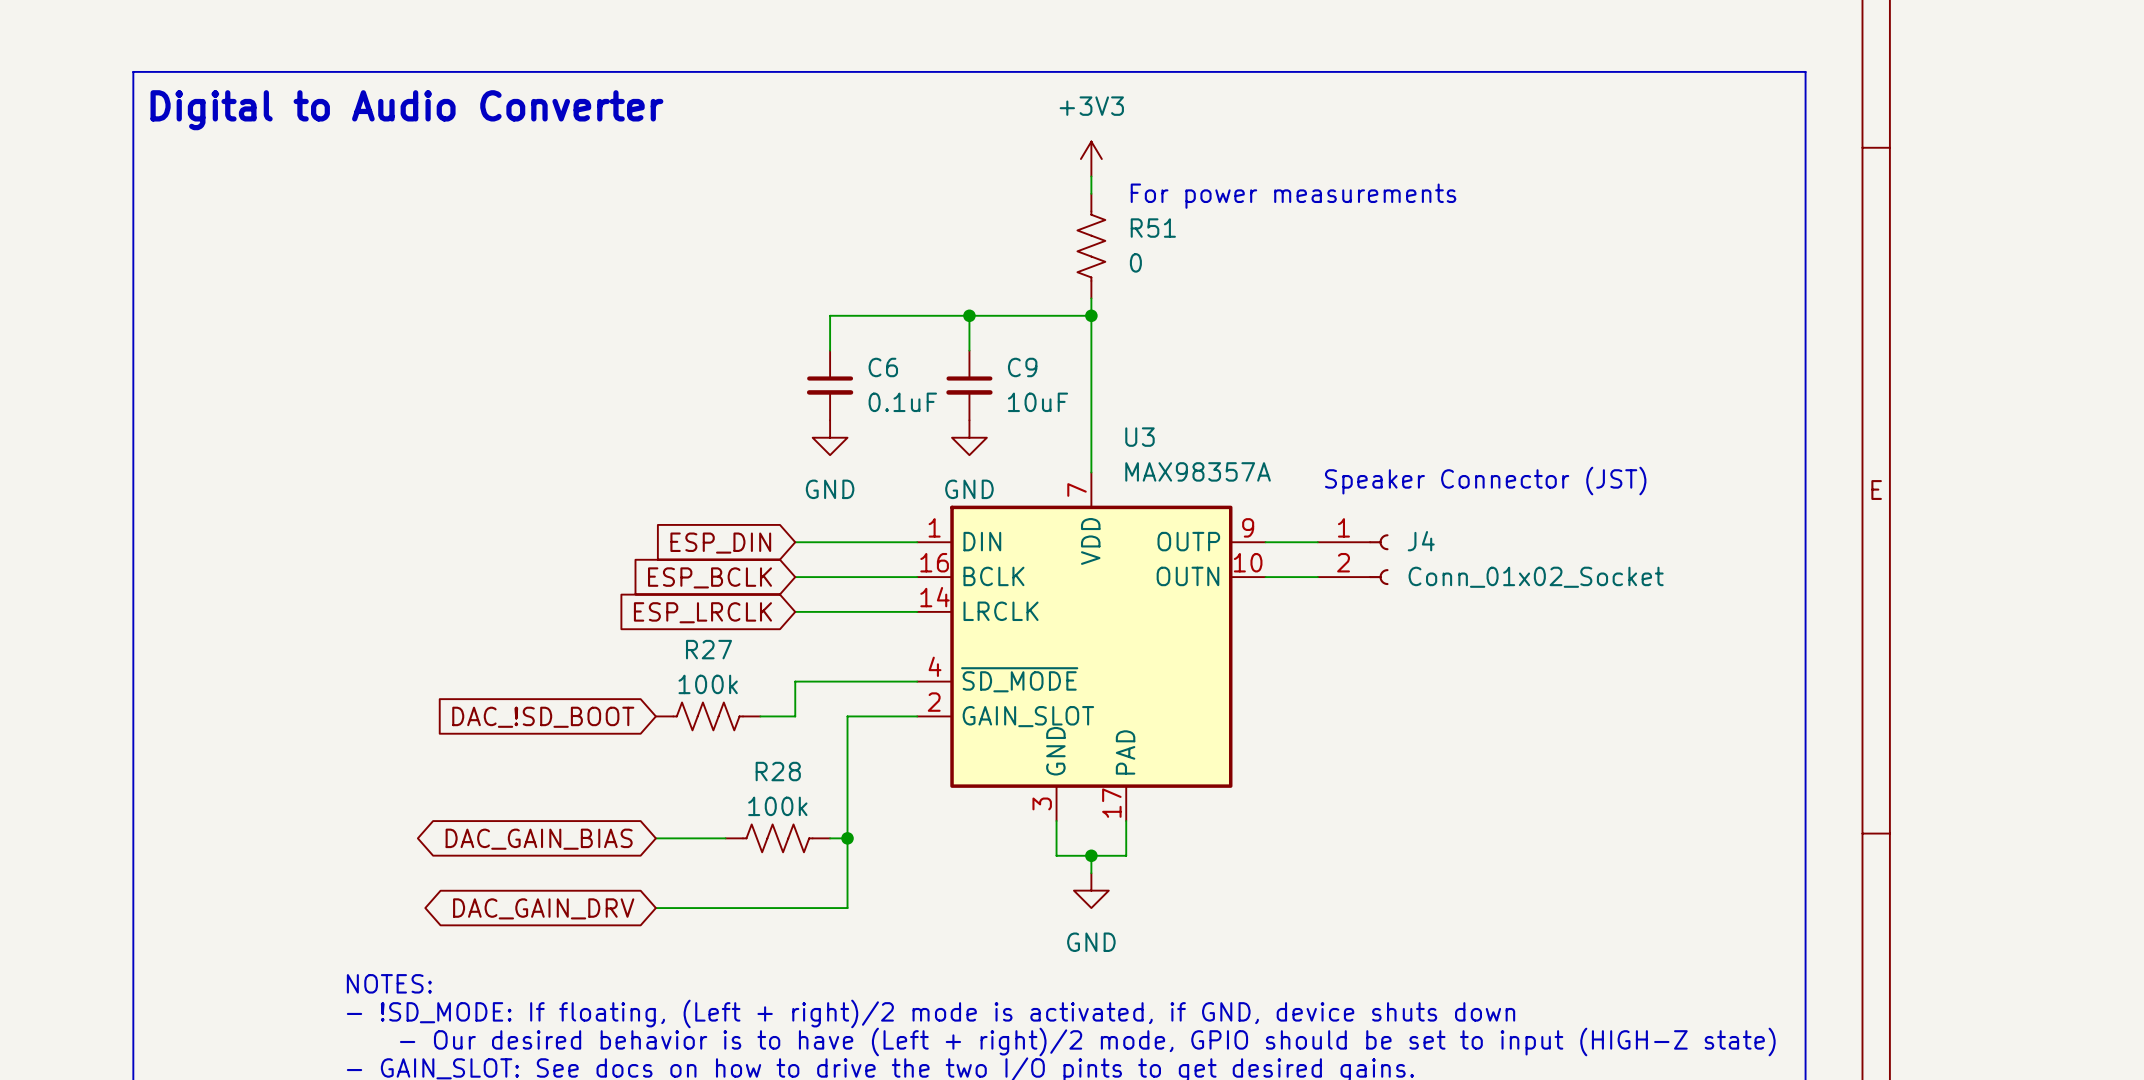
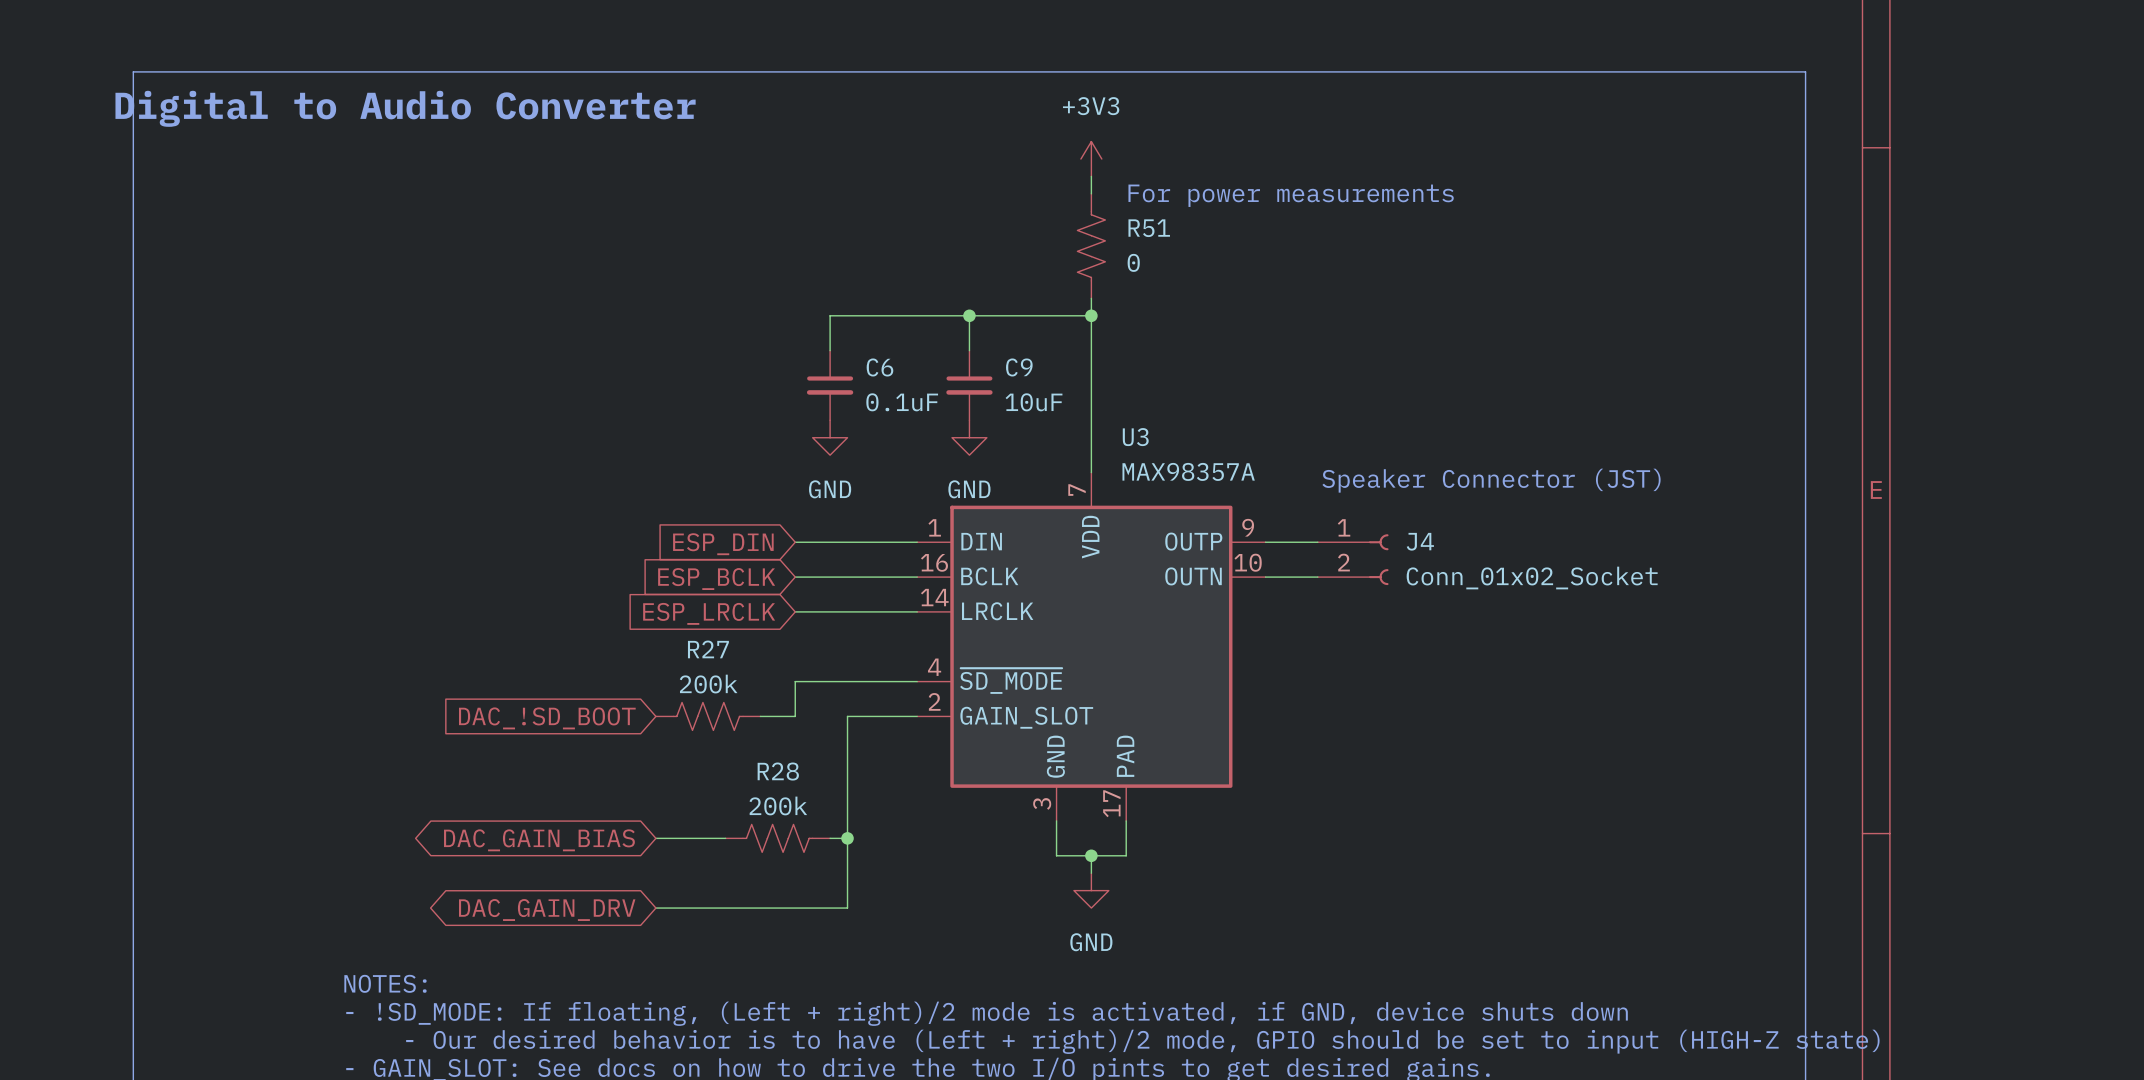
R27 value: 100k (708, 684) -> 200k (708, 684)
R28 value: 100k (777, 806) -> 200k (778, 805)

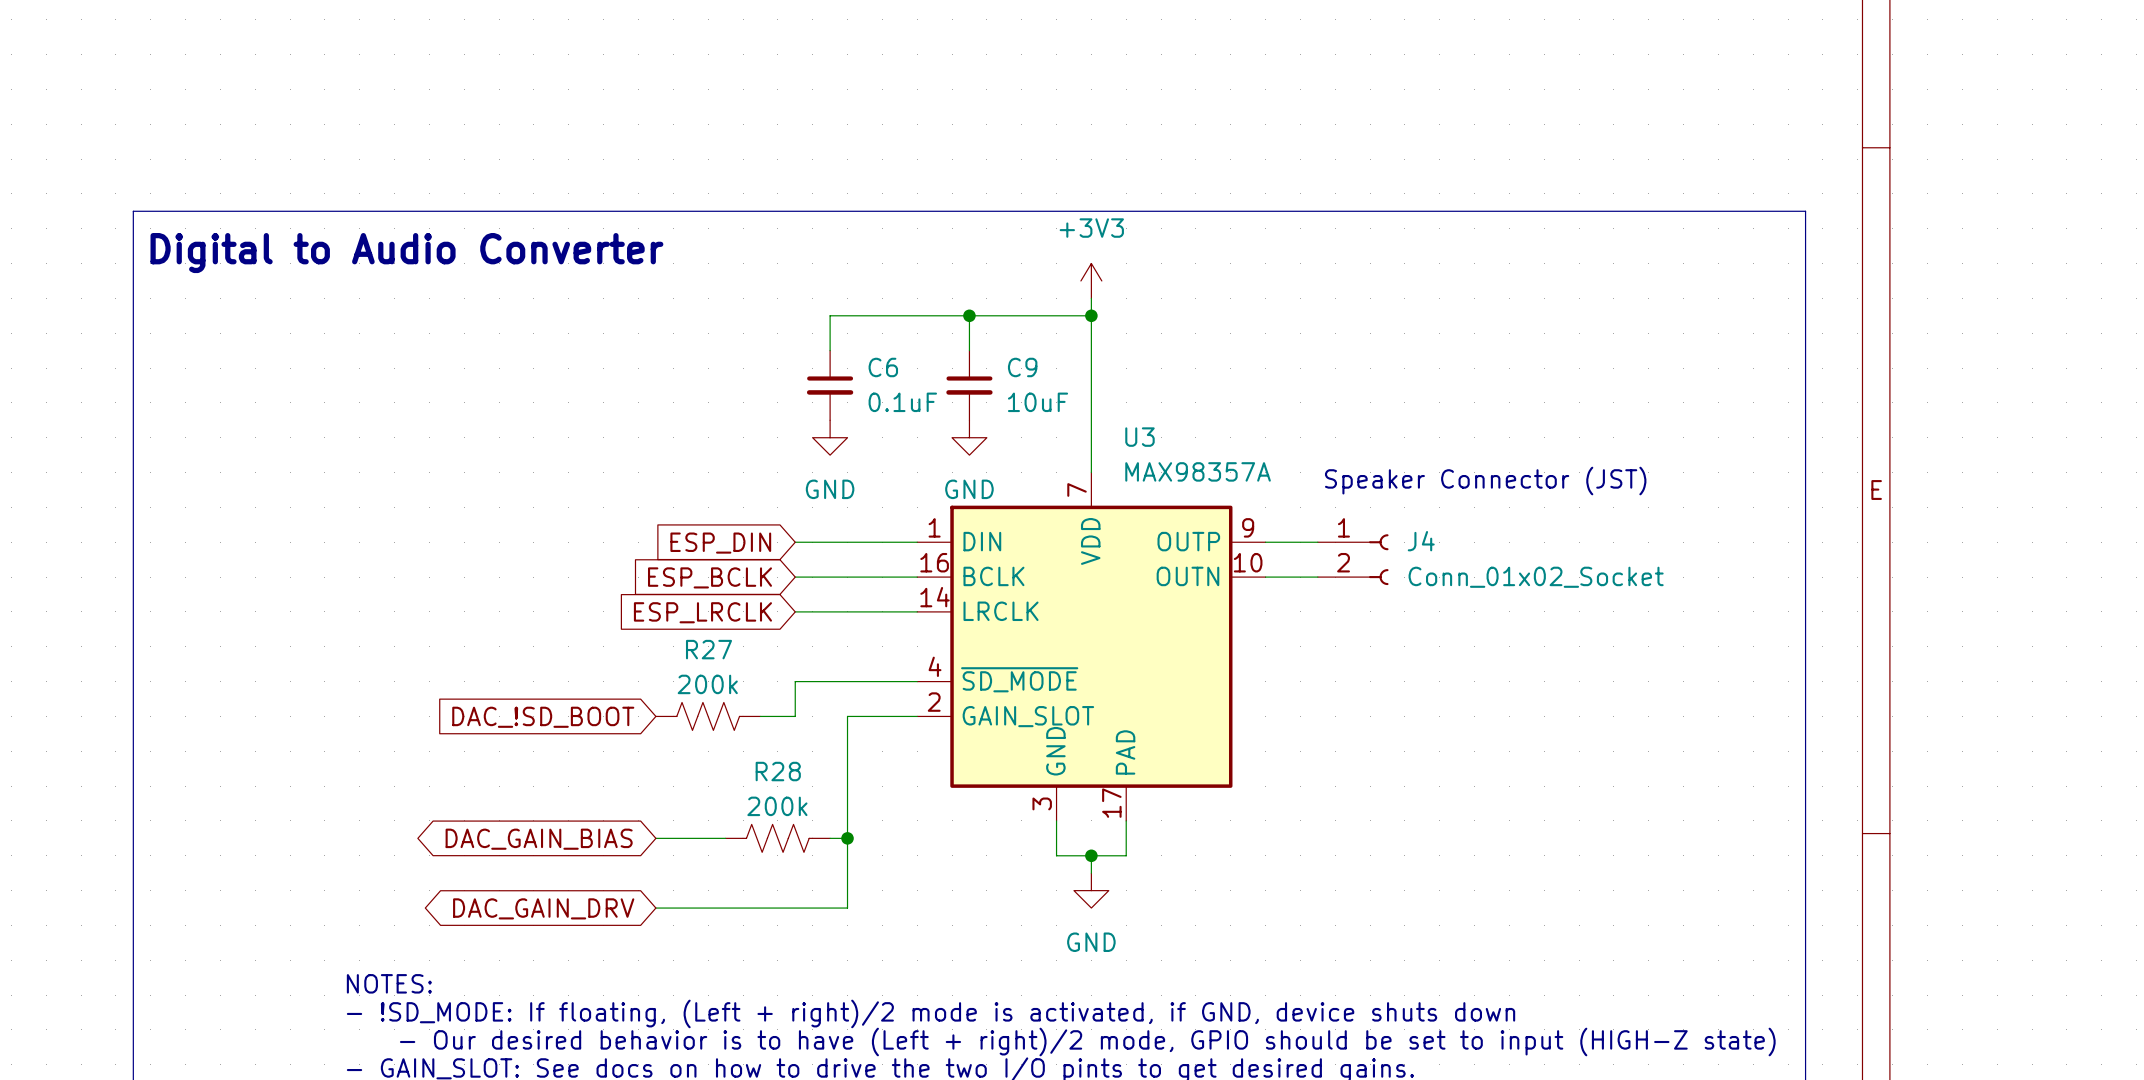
text position: Digital to Audio Converter (405, 108) -> Digital to Audio Converter (406, 253)
power symbol position: +3V3 (1091, 159) -> +3V3 (1091, 280)
wire: (1091, 176) (1091, 193) -> none
text: For power measurements (1291, 195) -> none
line: (133, 211) (133, 71) (1805, 71) (1805, 211) -> (133, 211) (1805, 211)
R51: 0 (1091, 246) -> none

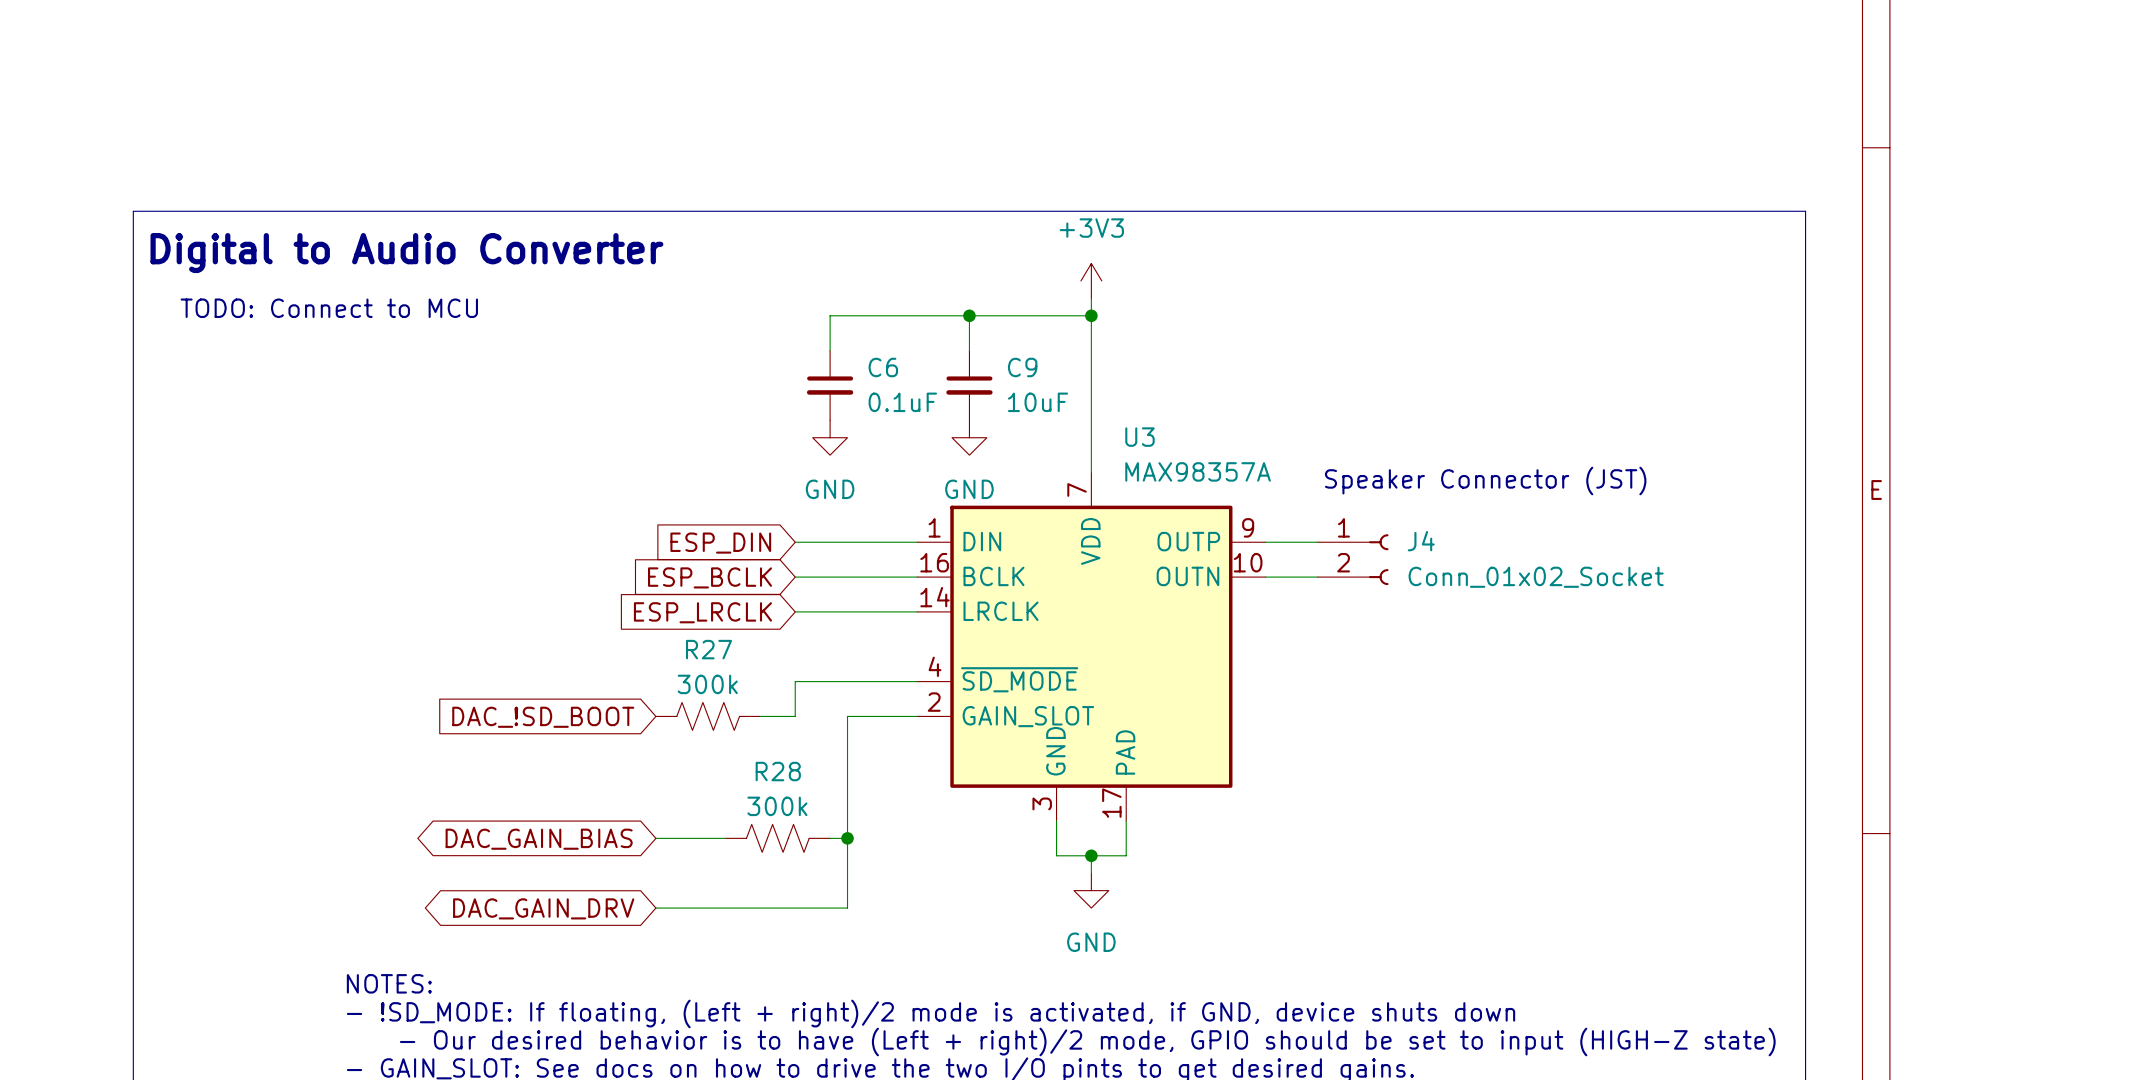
text: none -> TODO: Connect to MCU (329, 308)
R27 value: 200k (707, 684) -> 300k (707, 684)
R28 value: 200k (777, 806) -> 300k (777, 806)

